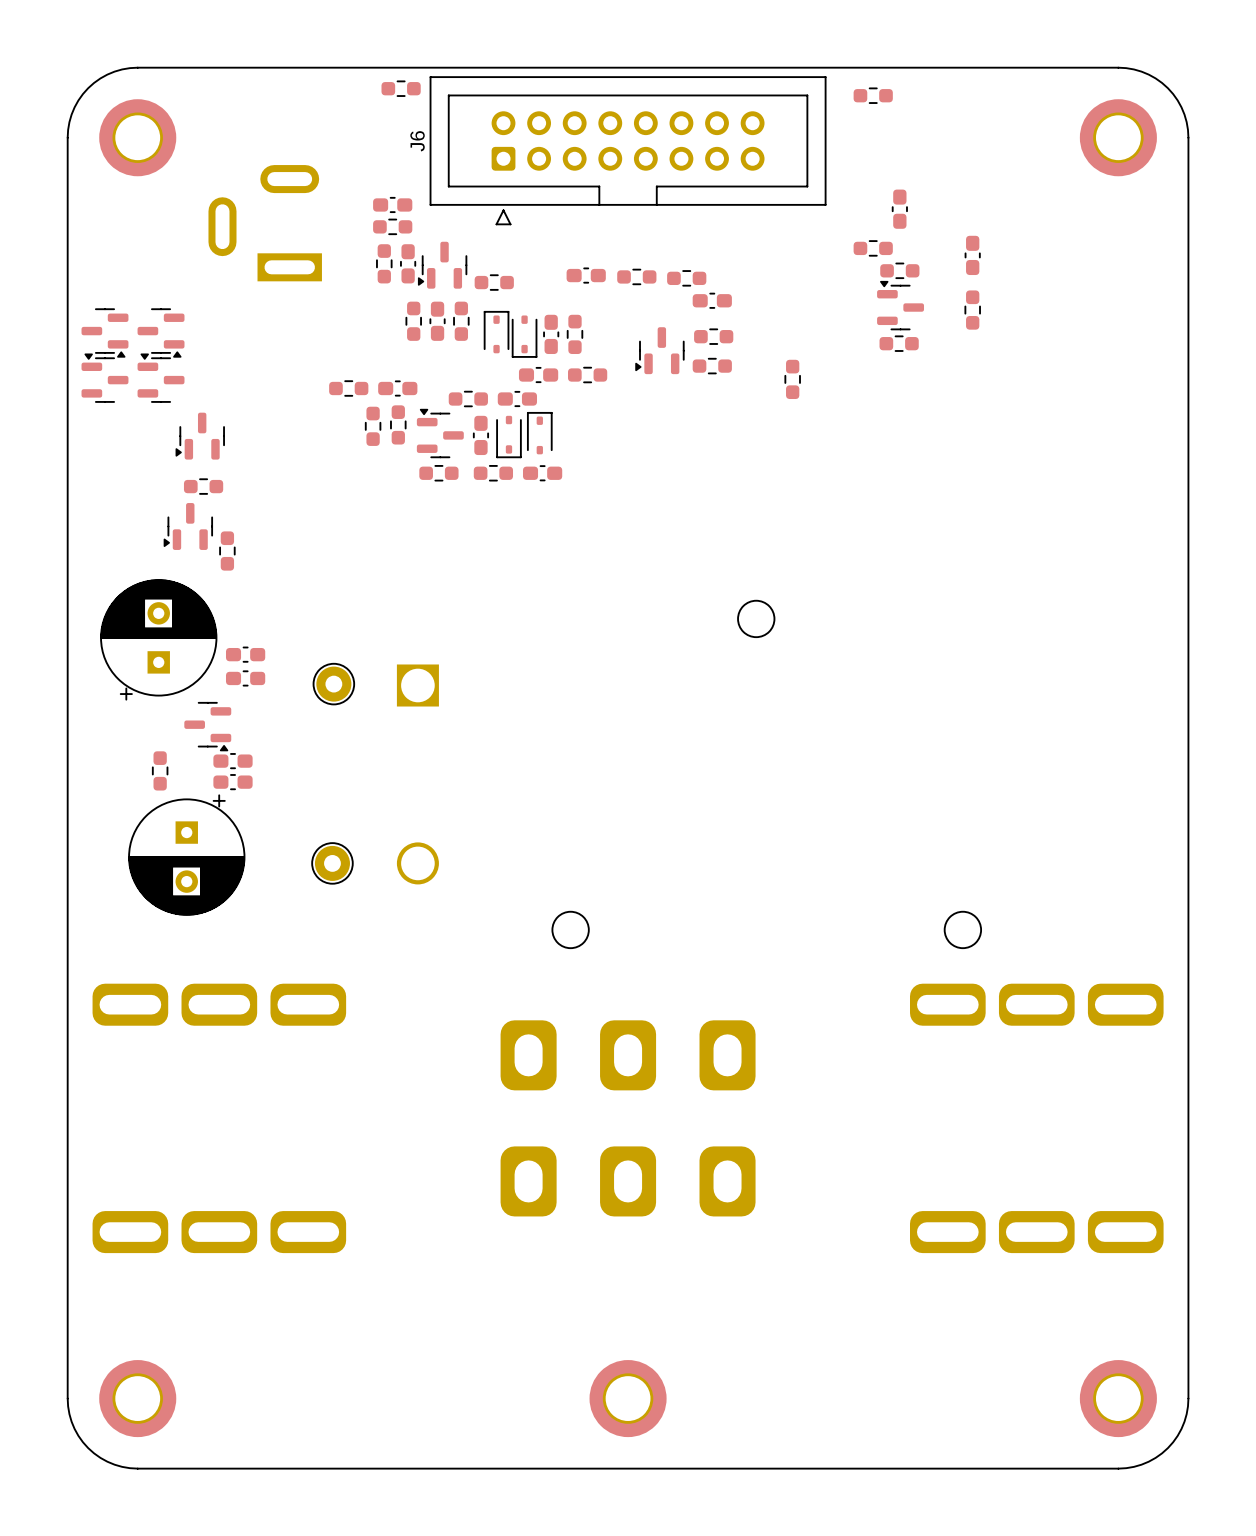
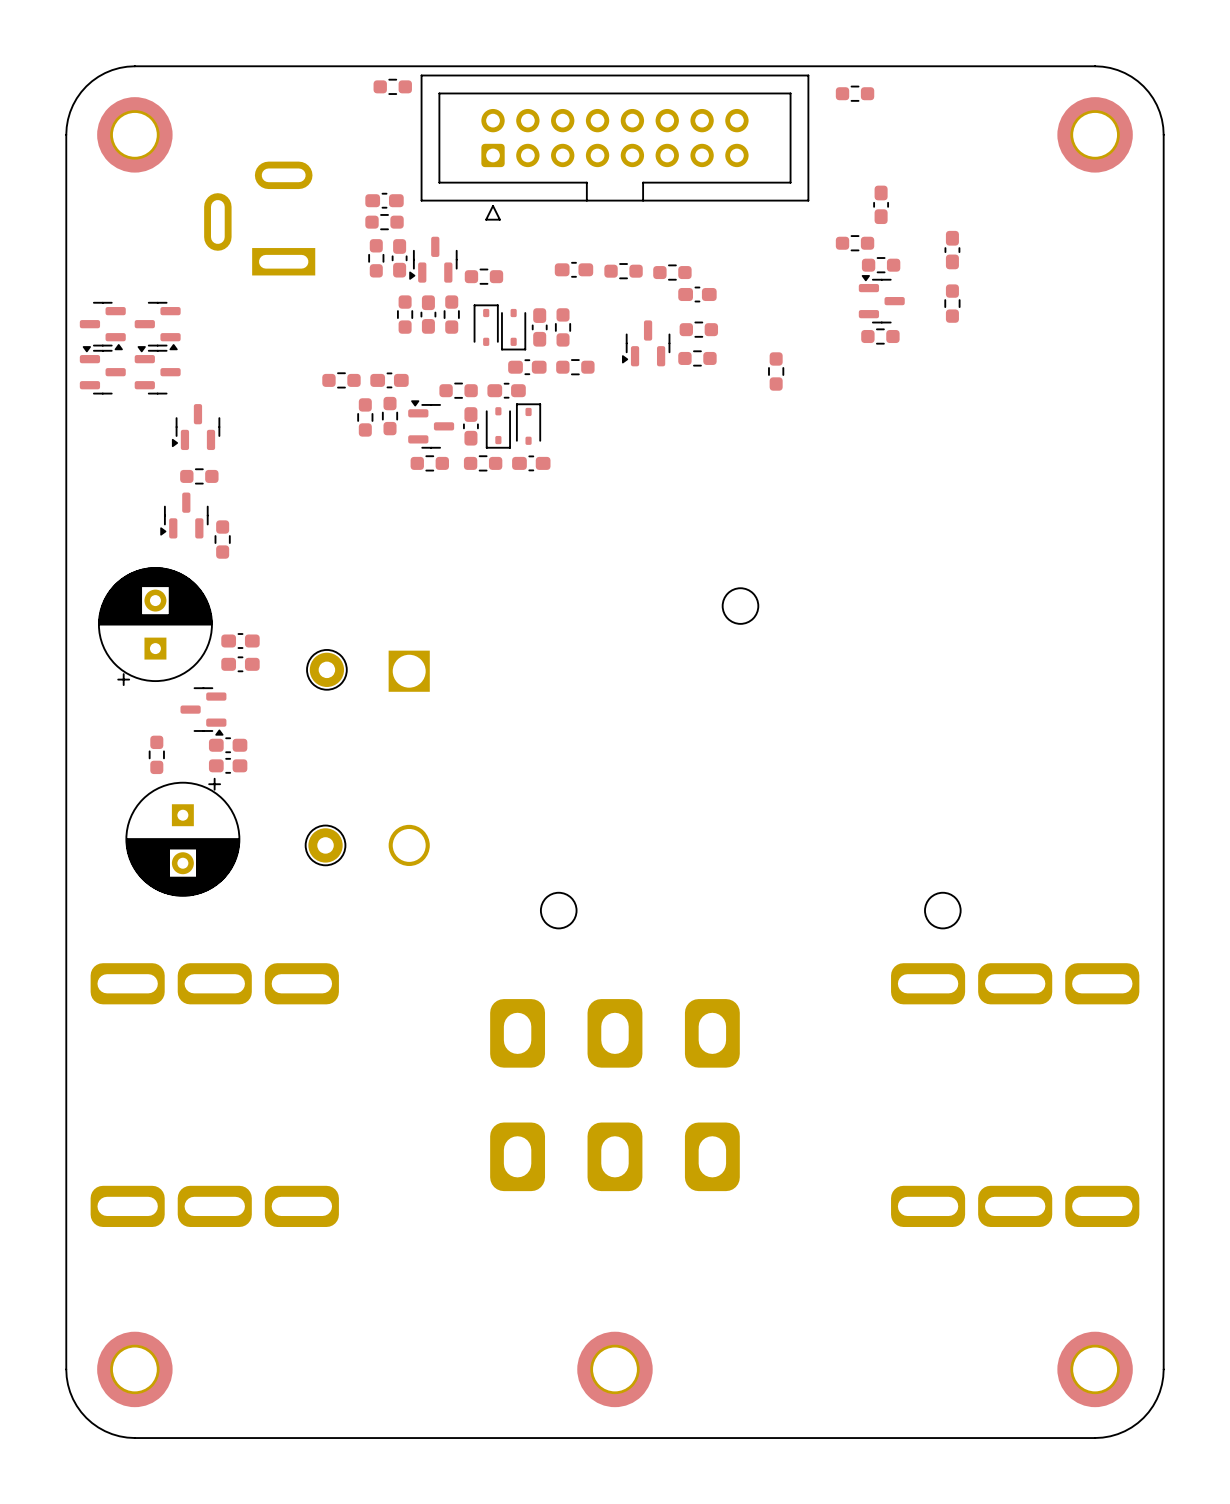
J6 name: J6 (417, 141) -> none

